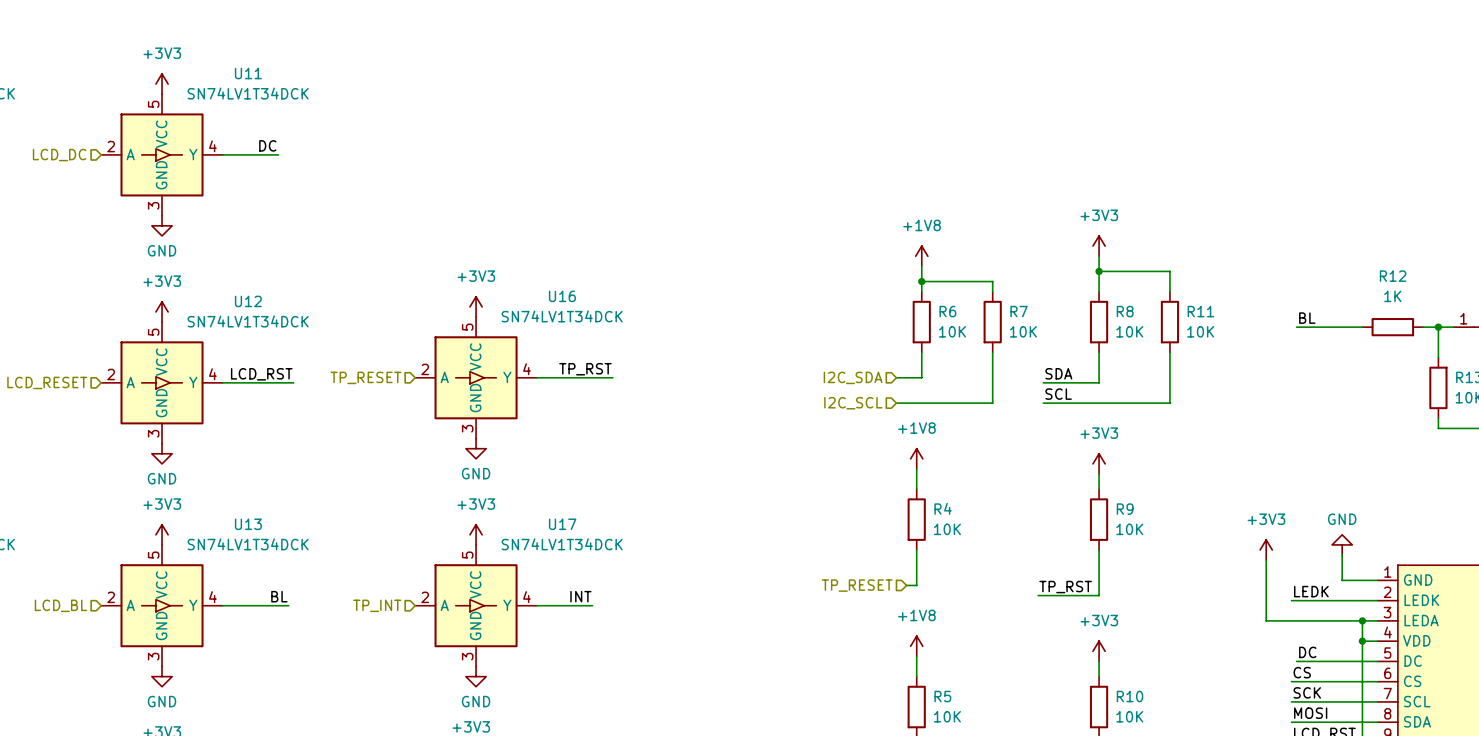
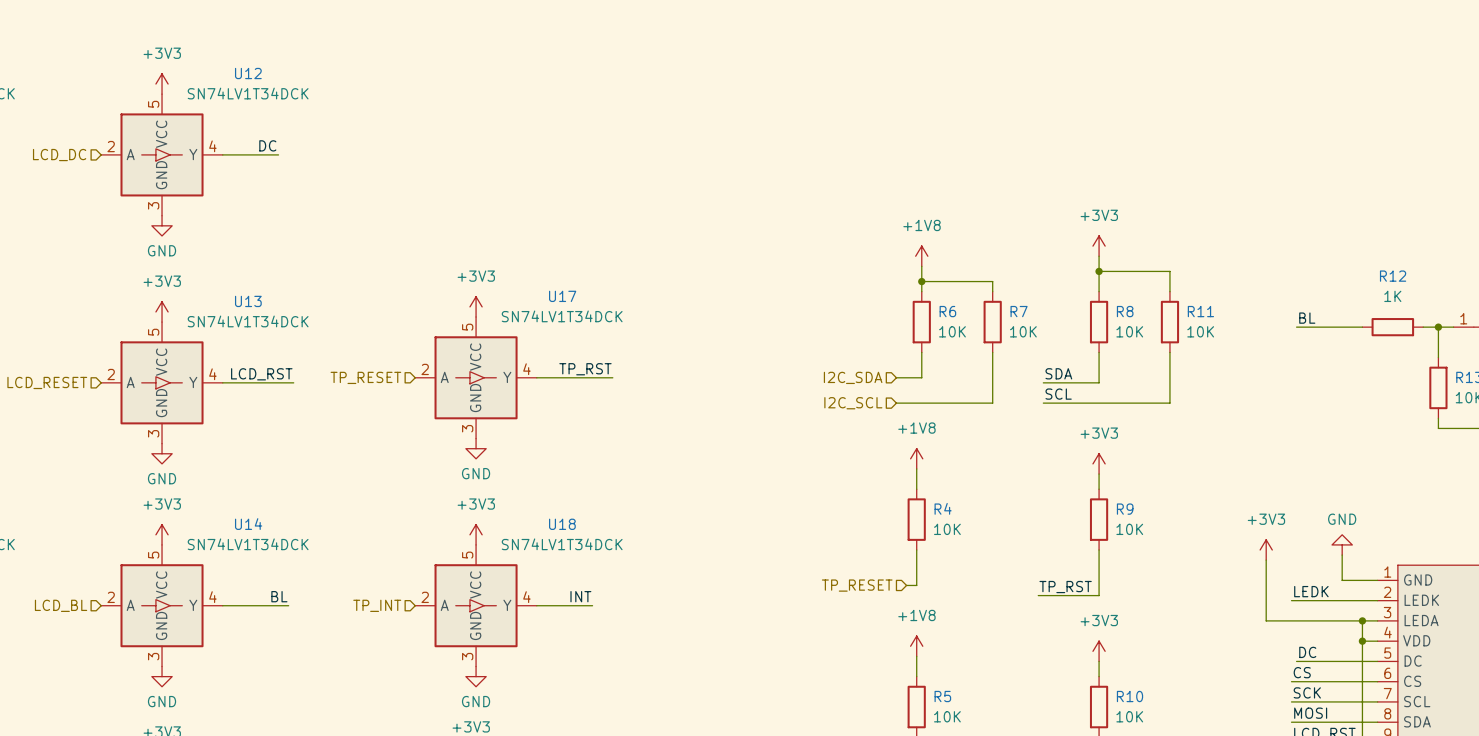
U11 name: U11 (248, 73) -> U12 (248, 73)
U16 name: U16 (562, 296) -> U17 (562, 296)
U12 name: U12 (248, 301) -> U13 (248, 301)
U13 name: U13 (248, 524) -> U14 (248, 524)
U17 name: U17 (562, 524) -> U18 (562, 524)

